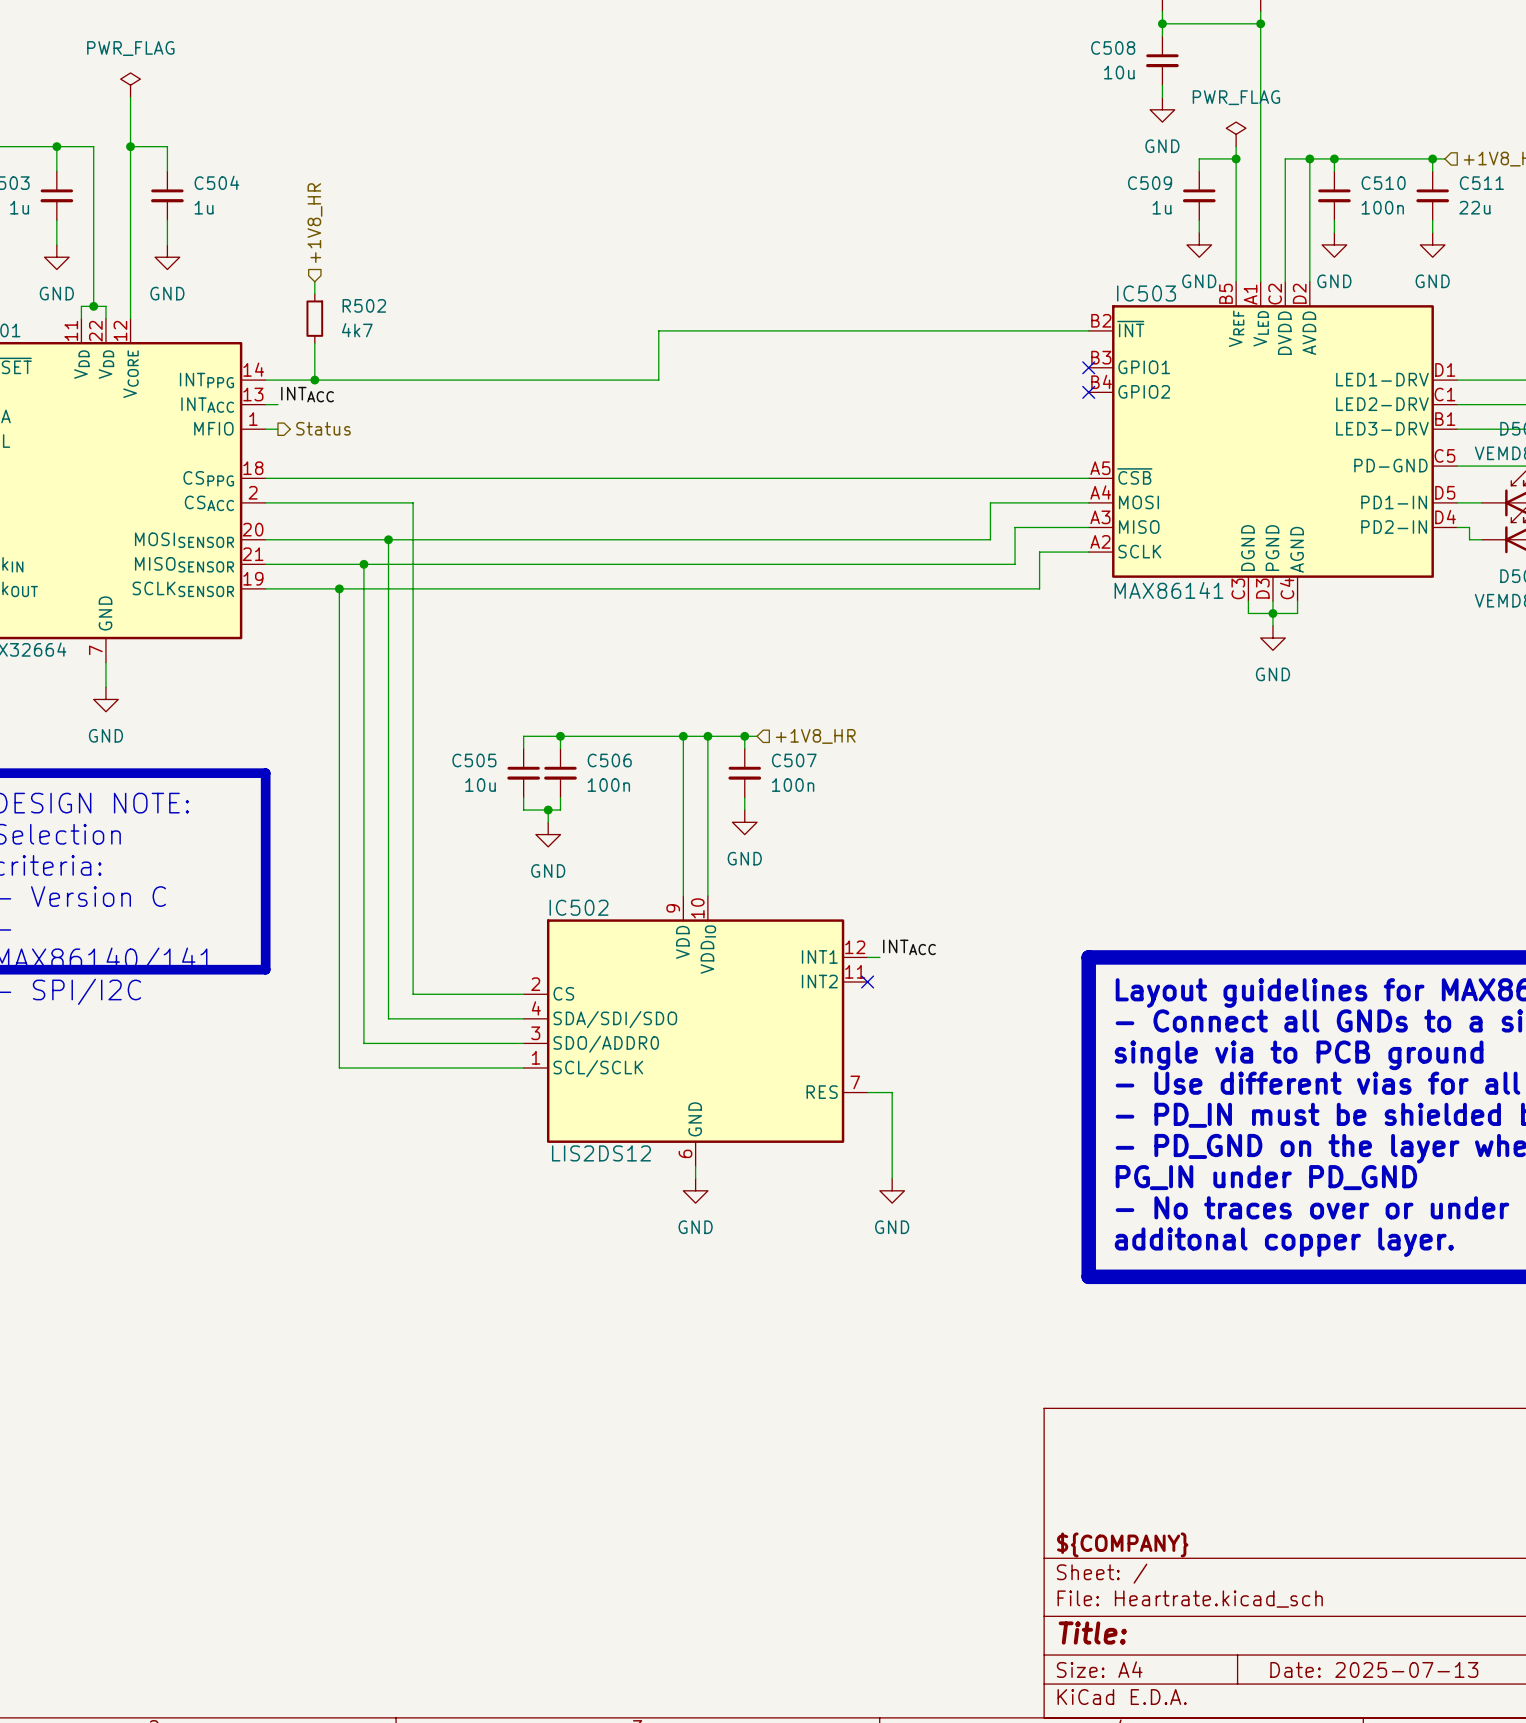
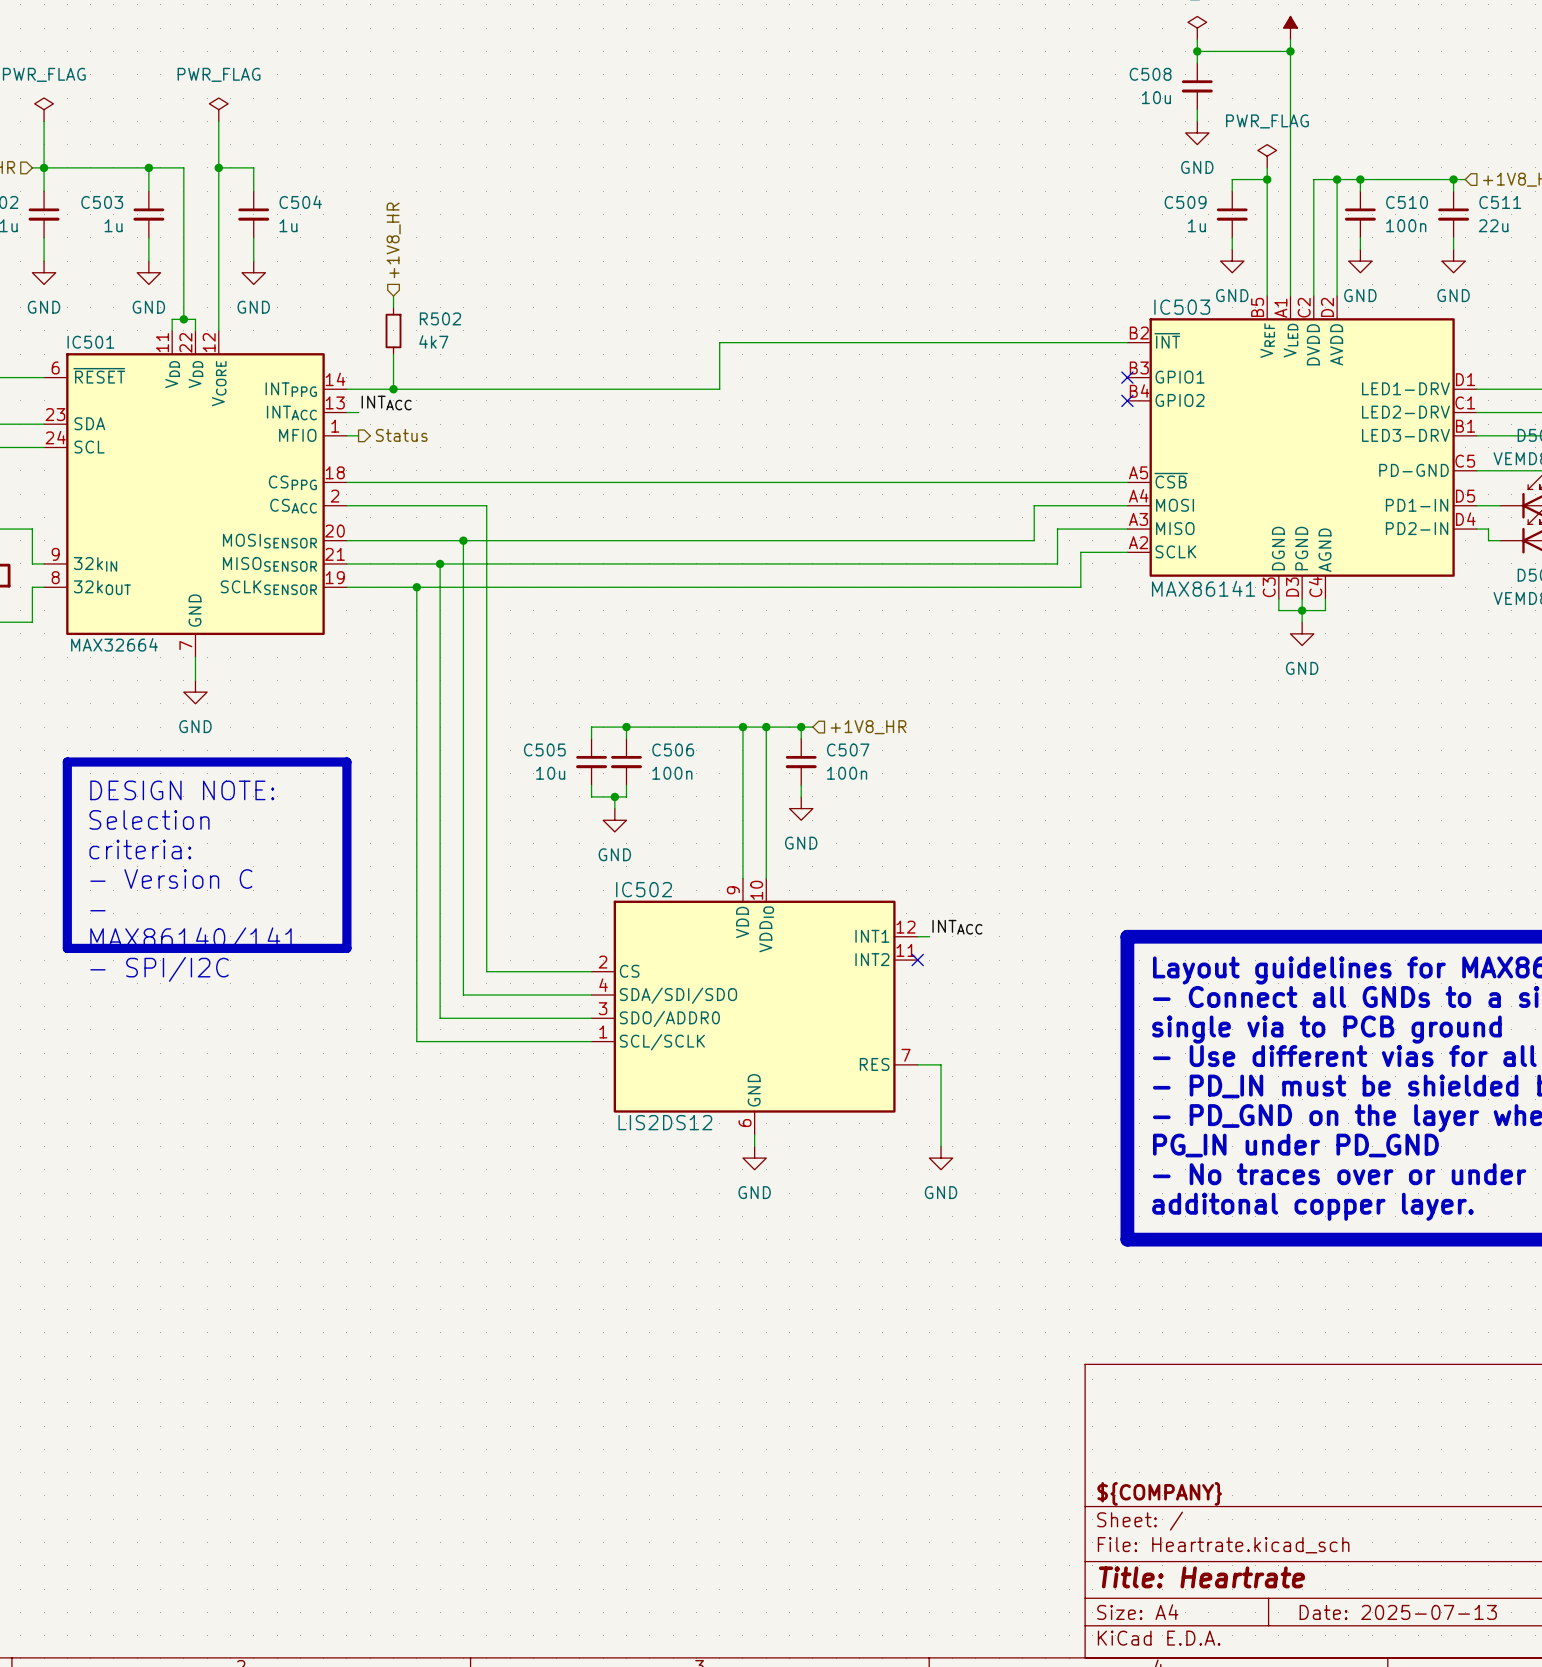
title block: Title: (1092, 1633) -> Title: Heartrate (1201, 1577)

